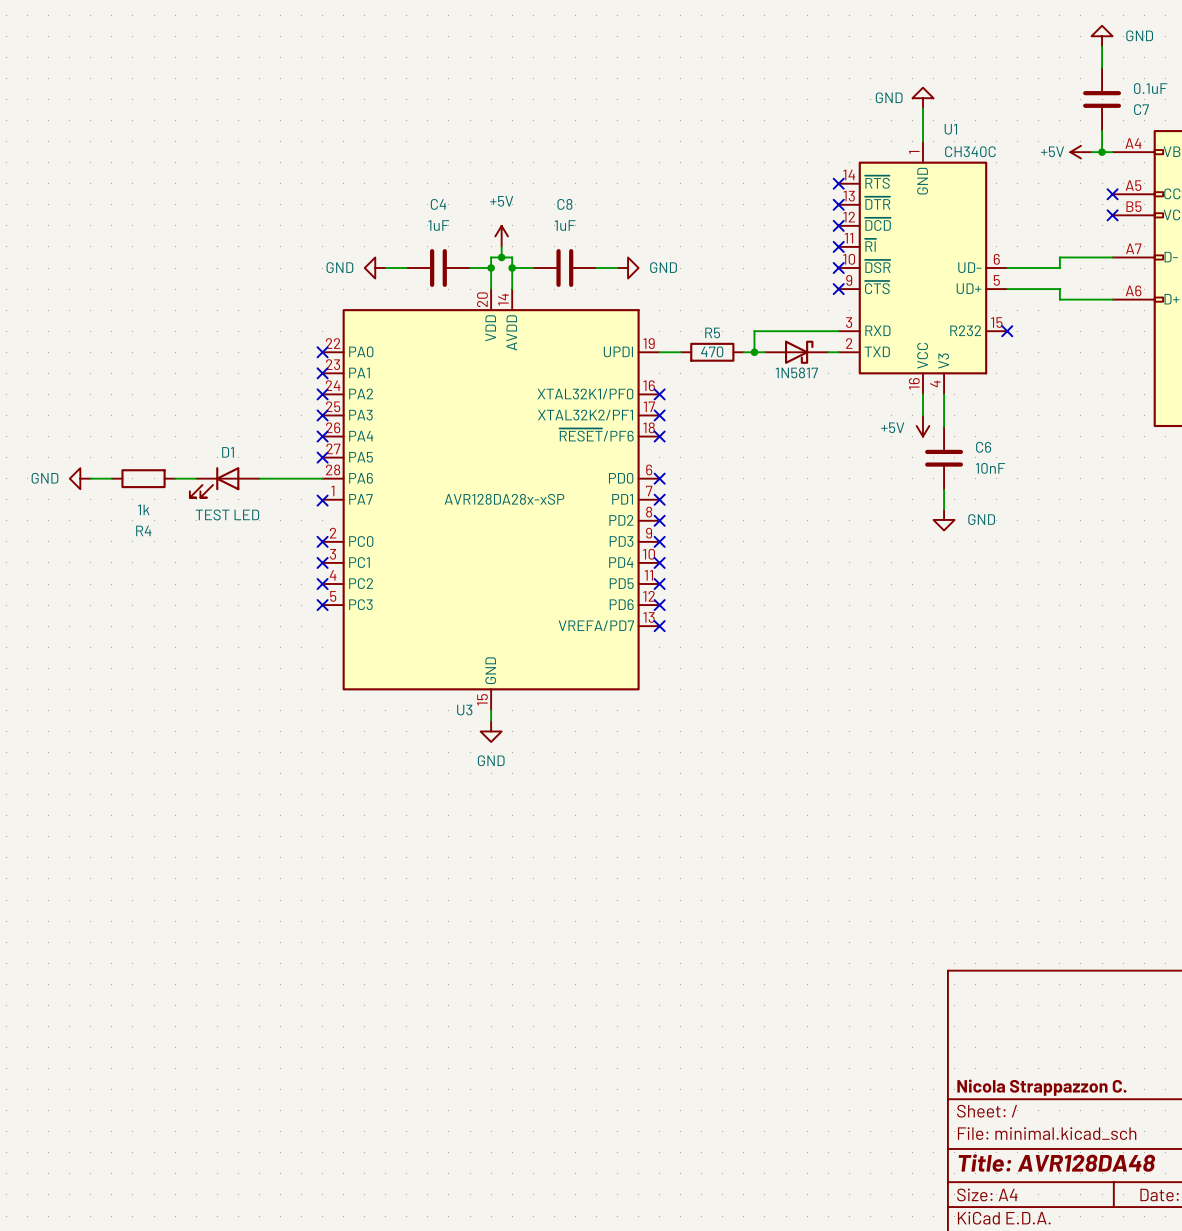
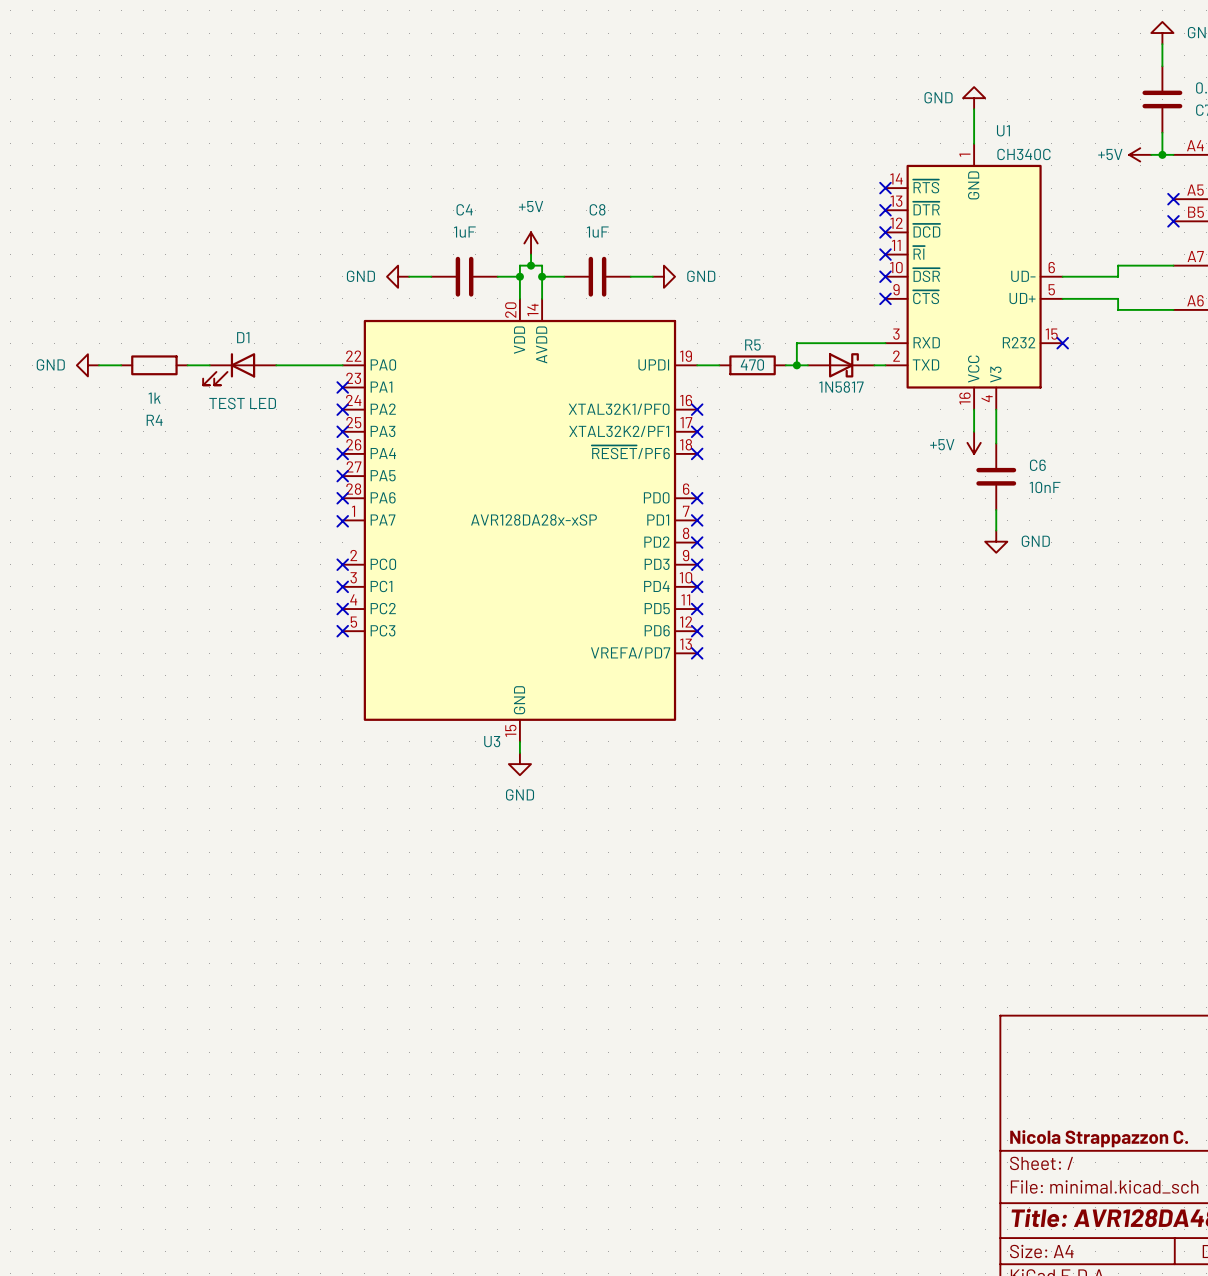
no-connect mark: (322, 352) -> none
power symbol position: GND (80, 478) -> GND (87, 365)
wire: (90, 478) (111, 478) -> (99, 365) (121, 365)
R4 position: (143, 478) -> (154, 365)
wire: (175, 478) (196, 478) -> (187, 365) (209, 365)
wire: (259, 478) (322, 478) -> (276, 365) (342, 365)
no-connect mark: none -> (342, 498)
D1 position: (224, 482) -> (239, 369)

